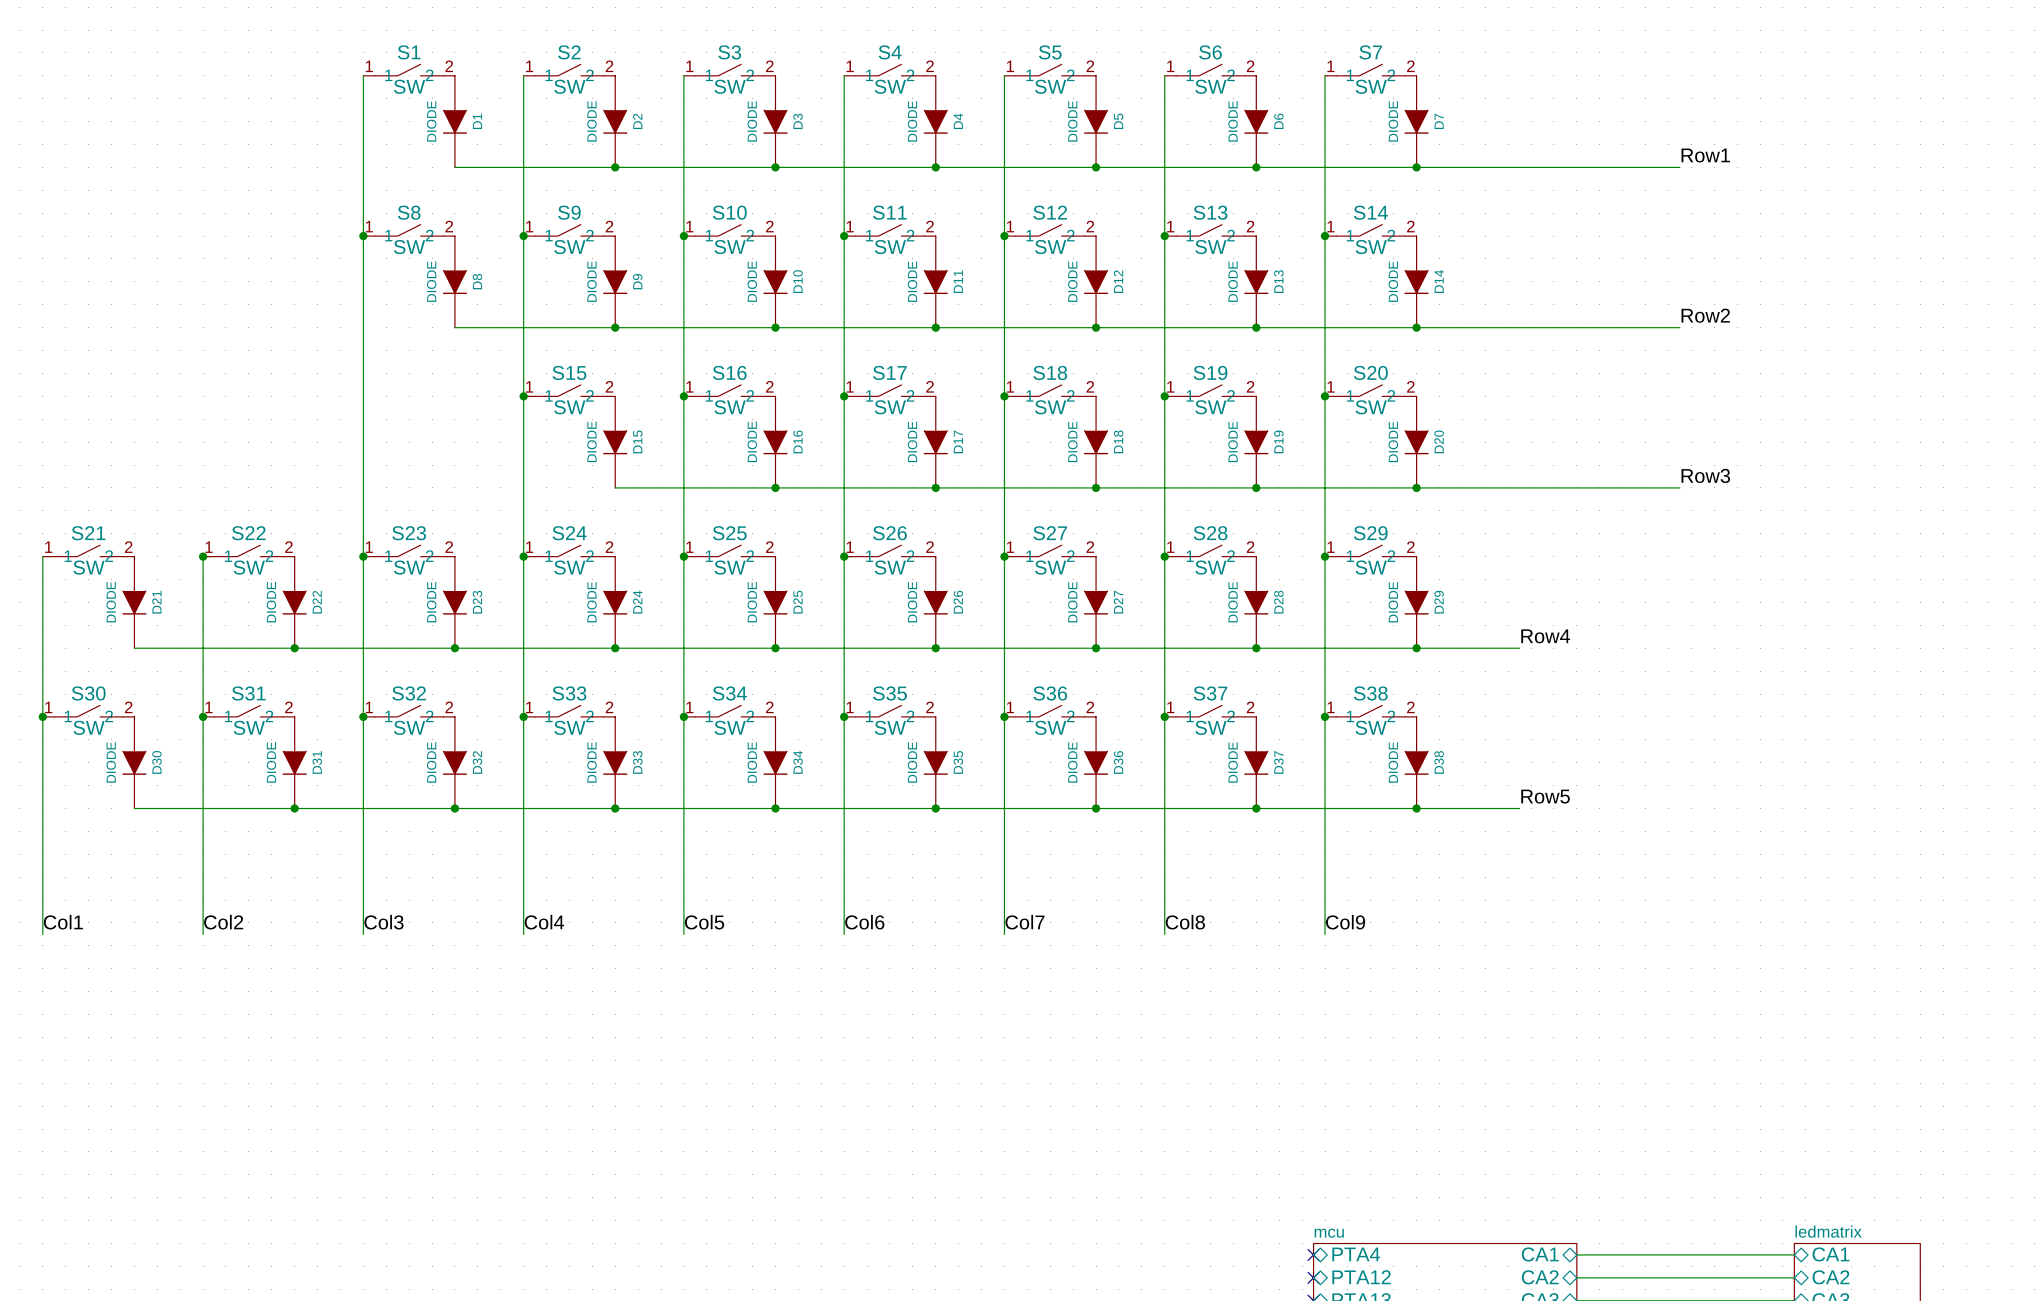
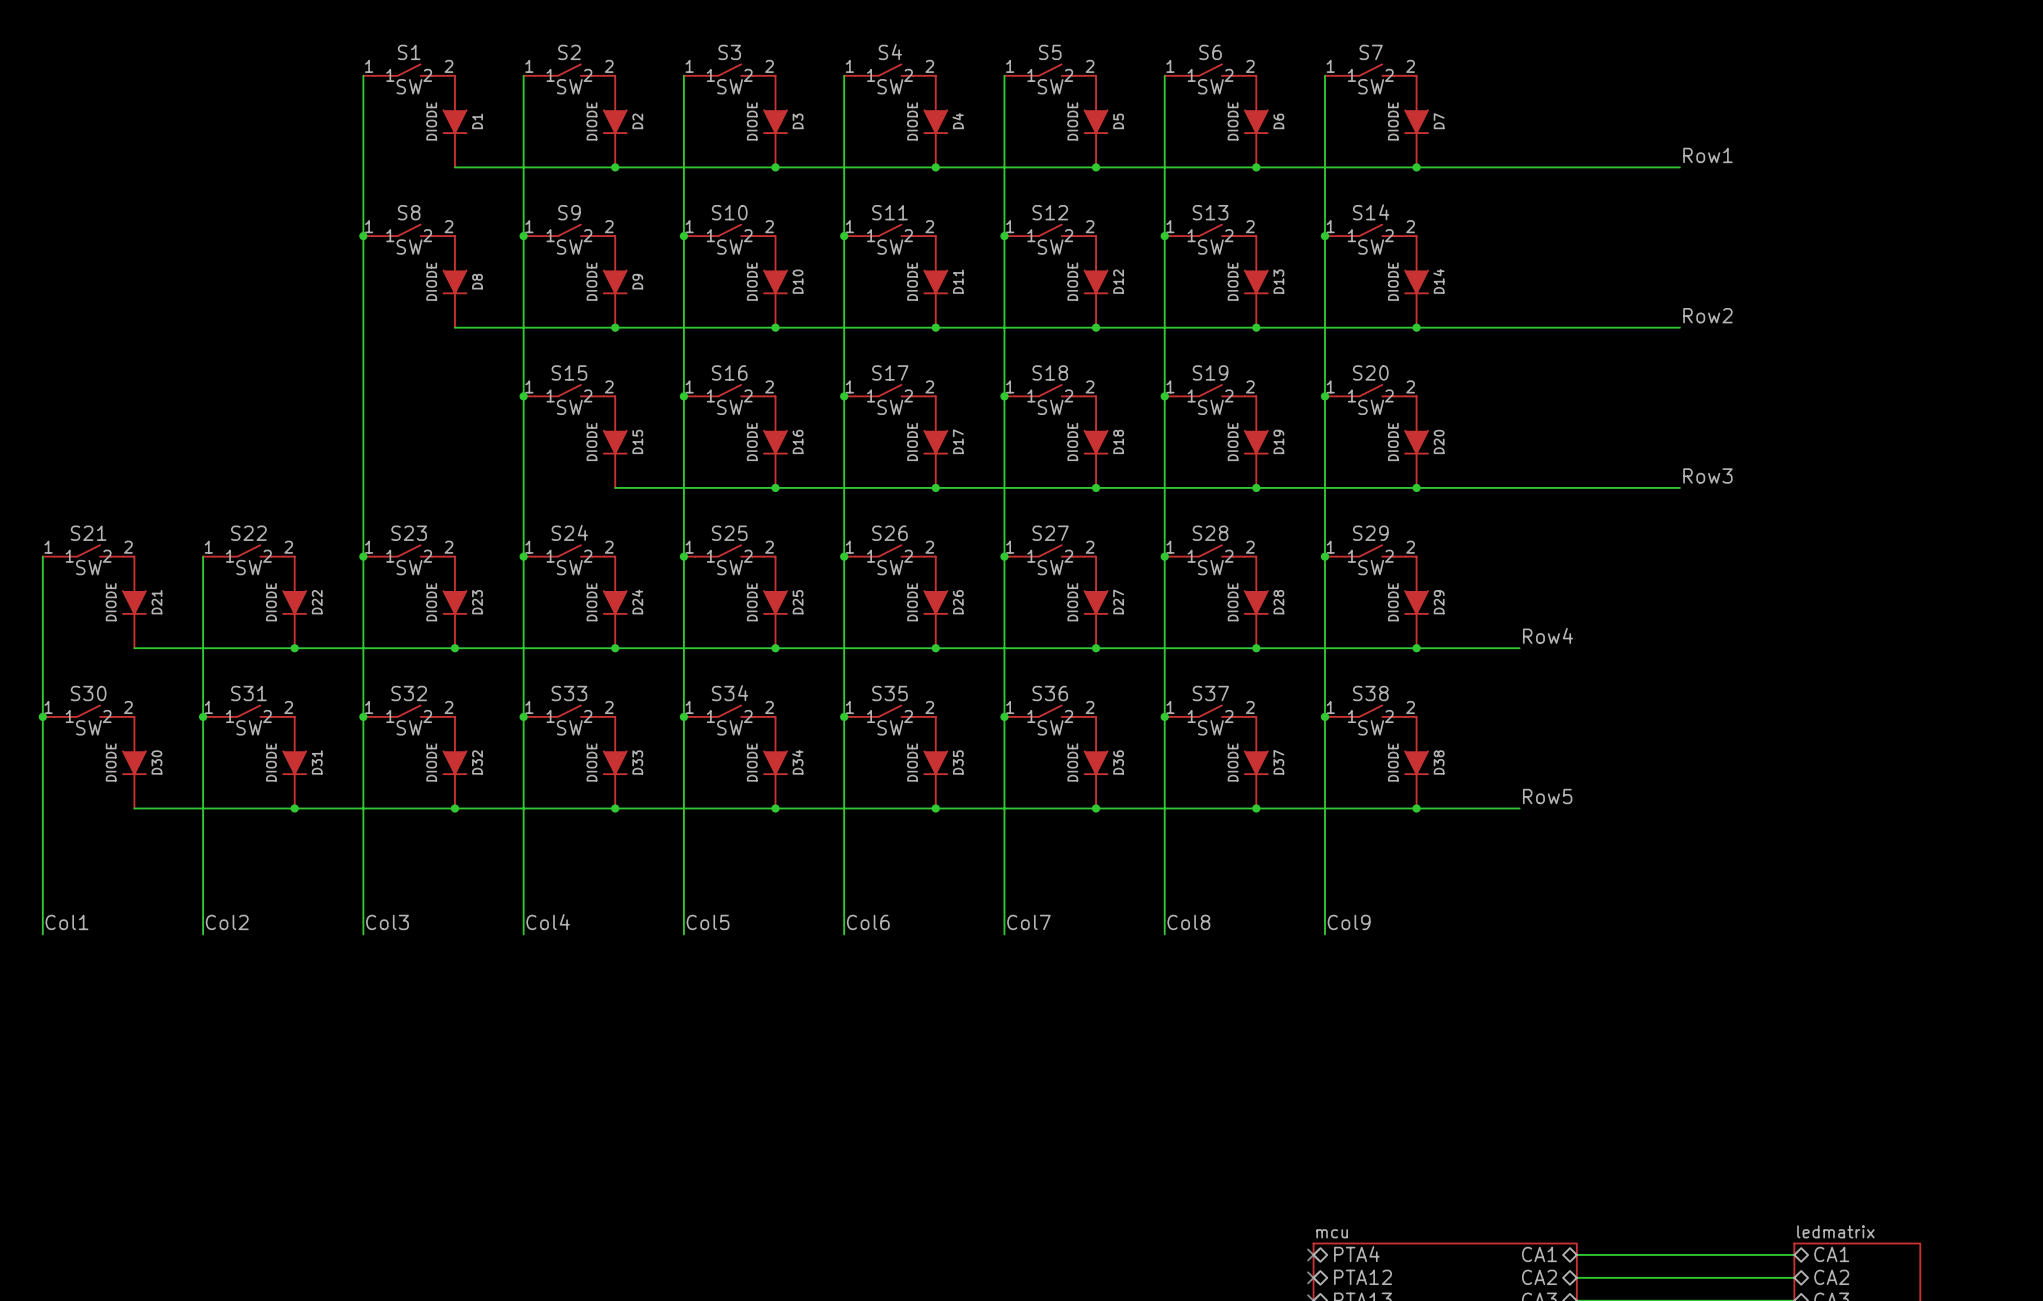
junction: (203, 556) -> none

